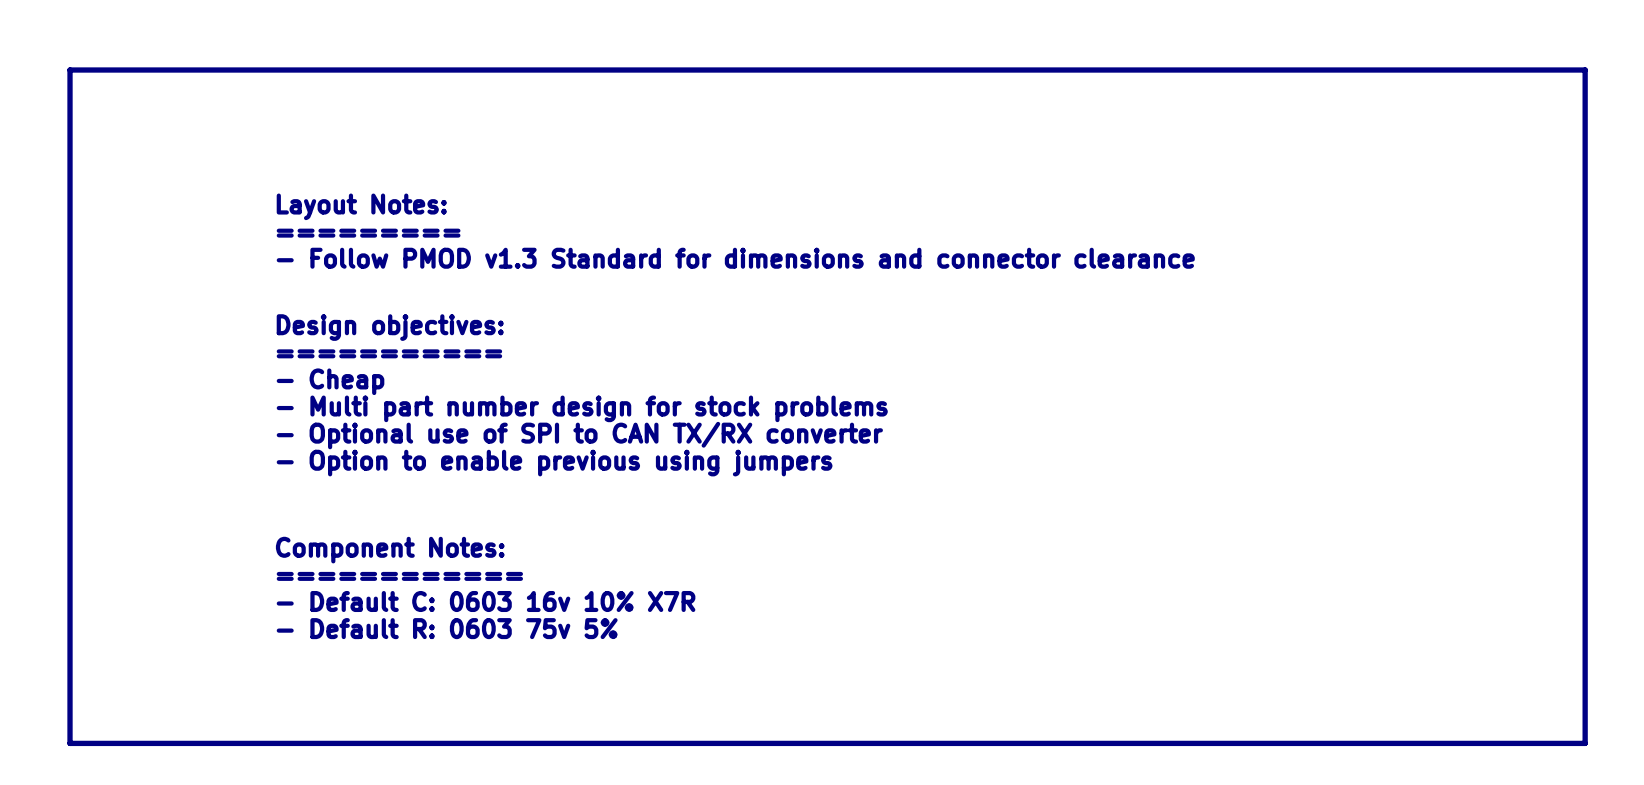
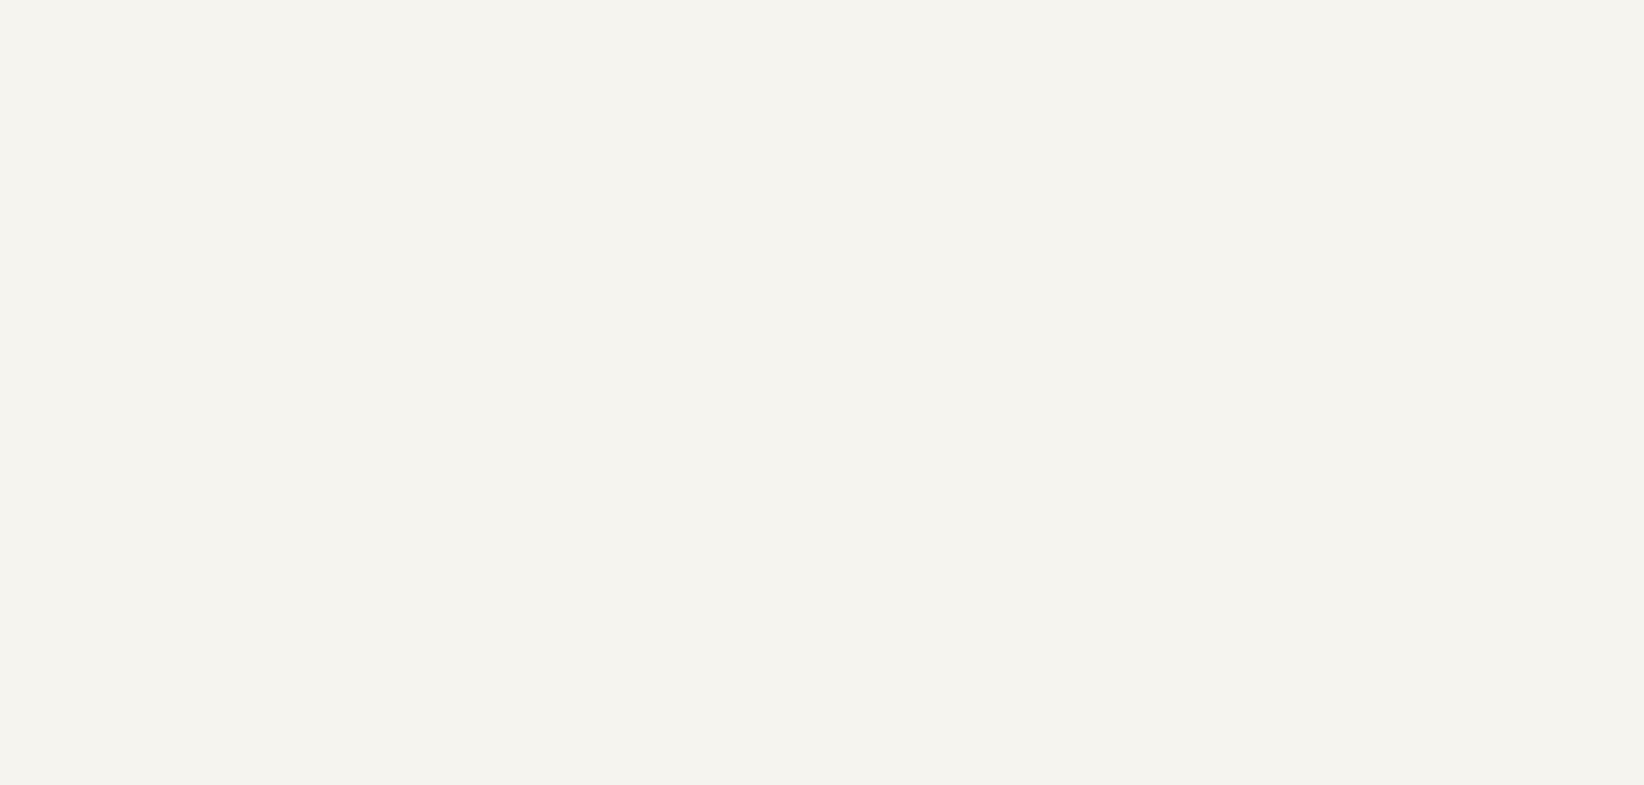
line: (70, 70) (1585, 70) (1585, 743) (70, 743) (70, 70) -> none
text: Layout Notes: (361, 206) -> none
text: ========= (368, 233) -> none
text: - Follow PMOD v1.3 Standard for dimensions and connector clearance (735, 258) -> none
text: Design objectives: (390, 327) -> none
text: =========== (389, 353) -> none
text: - Cheap (330, 381) -> none
text: - Multi part number design for stock problems (582, 408) -> none
text: - Optional use of SPI to CAN TX/RX converter (579, 435) -> none
text: - Option to enable previous using jumpers (554, 463) -> none
text: Component Notes: (390, 550) -> none
text: ============ (399, 576) -> none
text: - Default C: 0603 16v 10% X7R (486, 601) -> none
text: - Default R: 0603 75v 5% (447, 628) -> none

